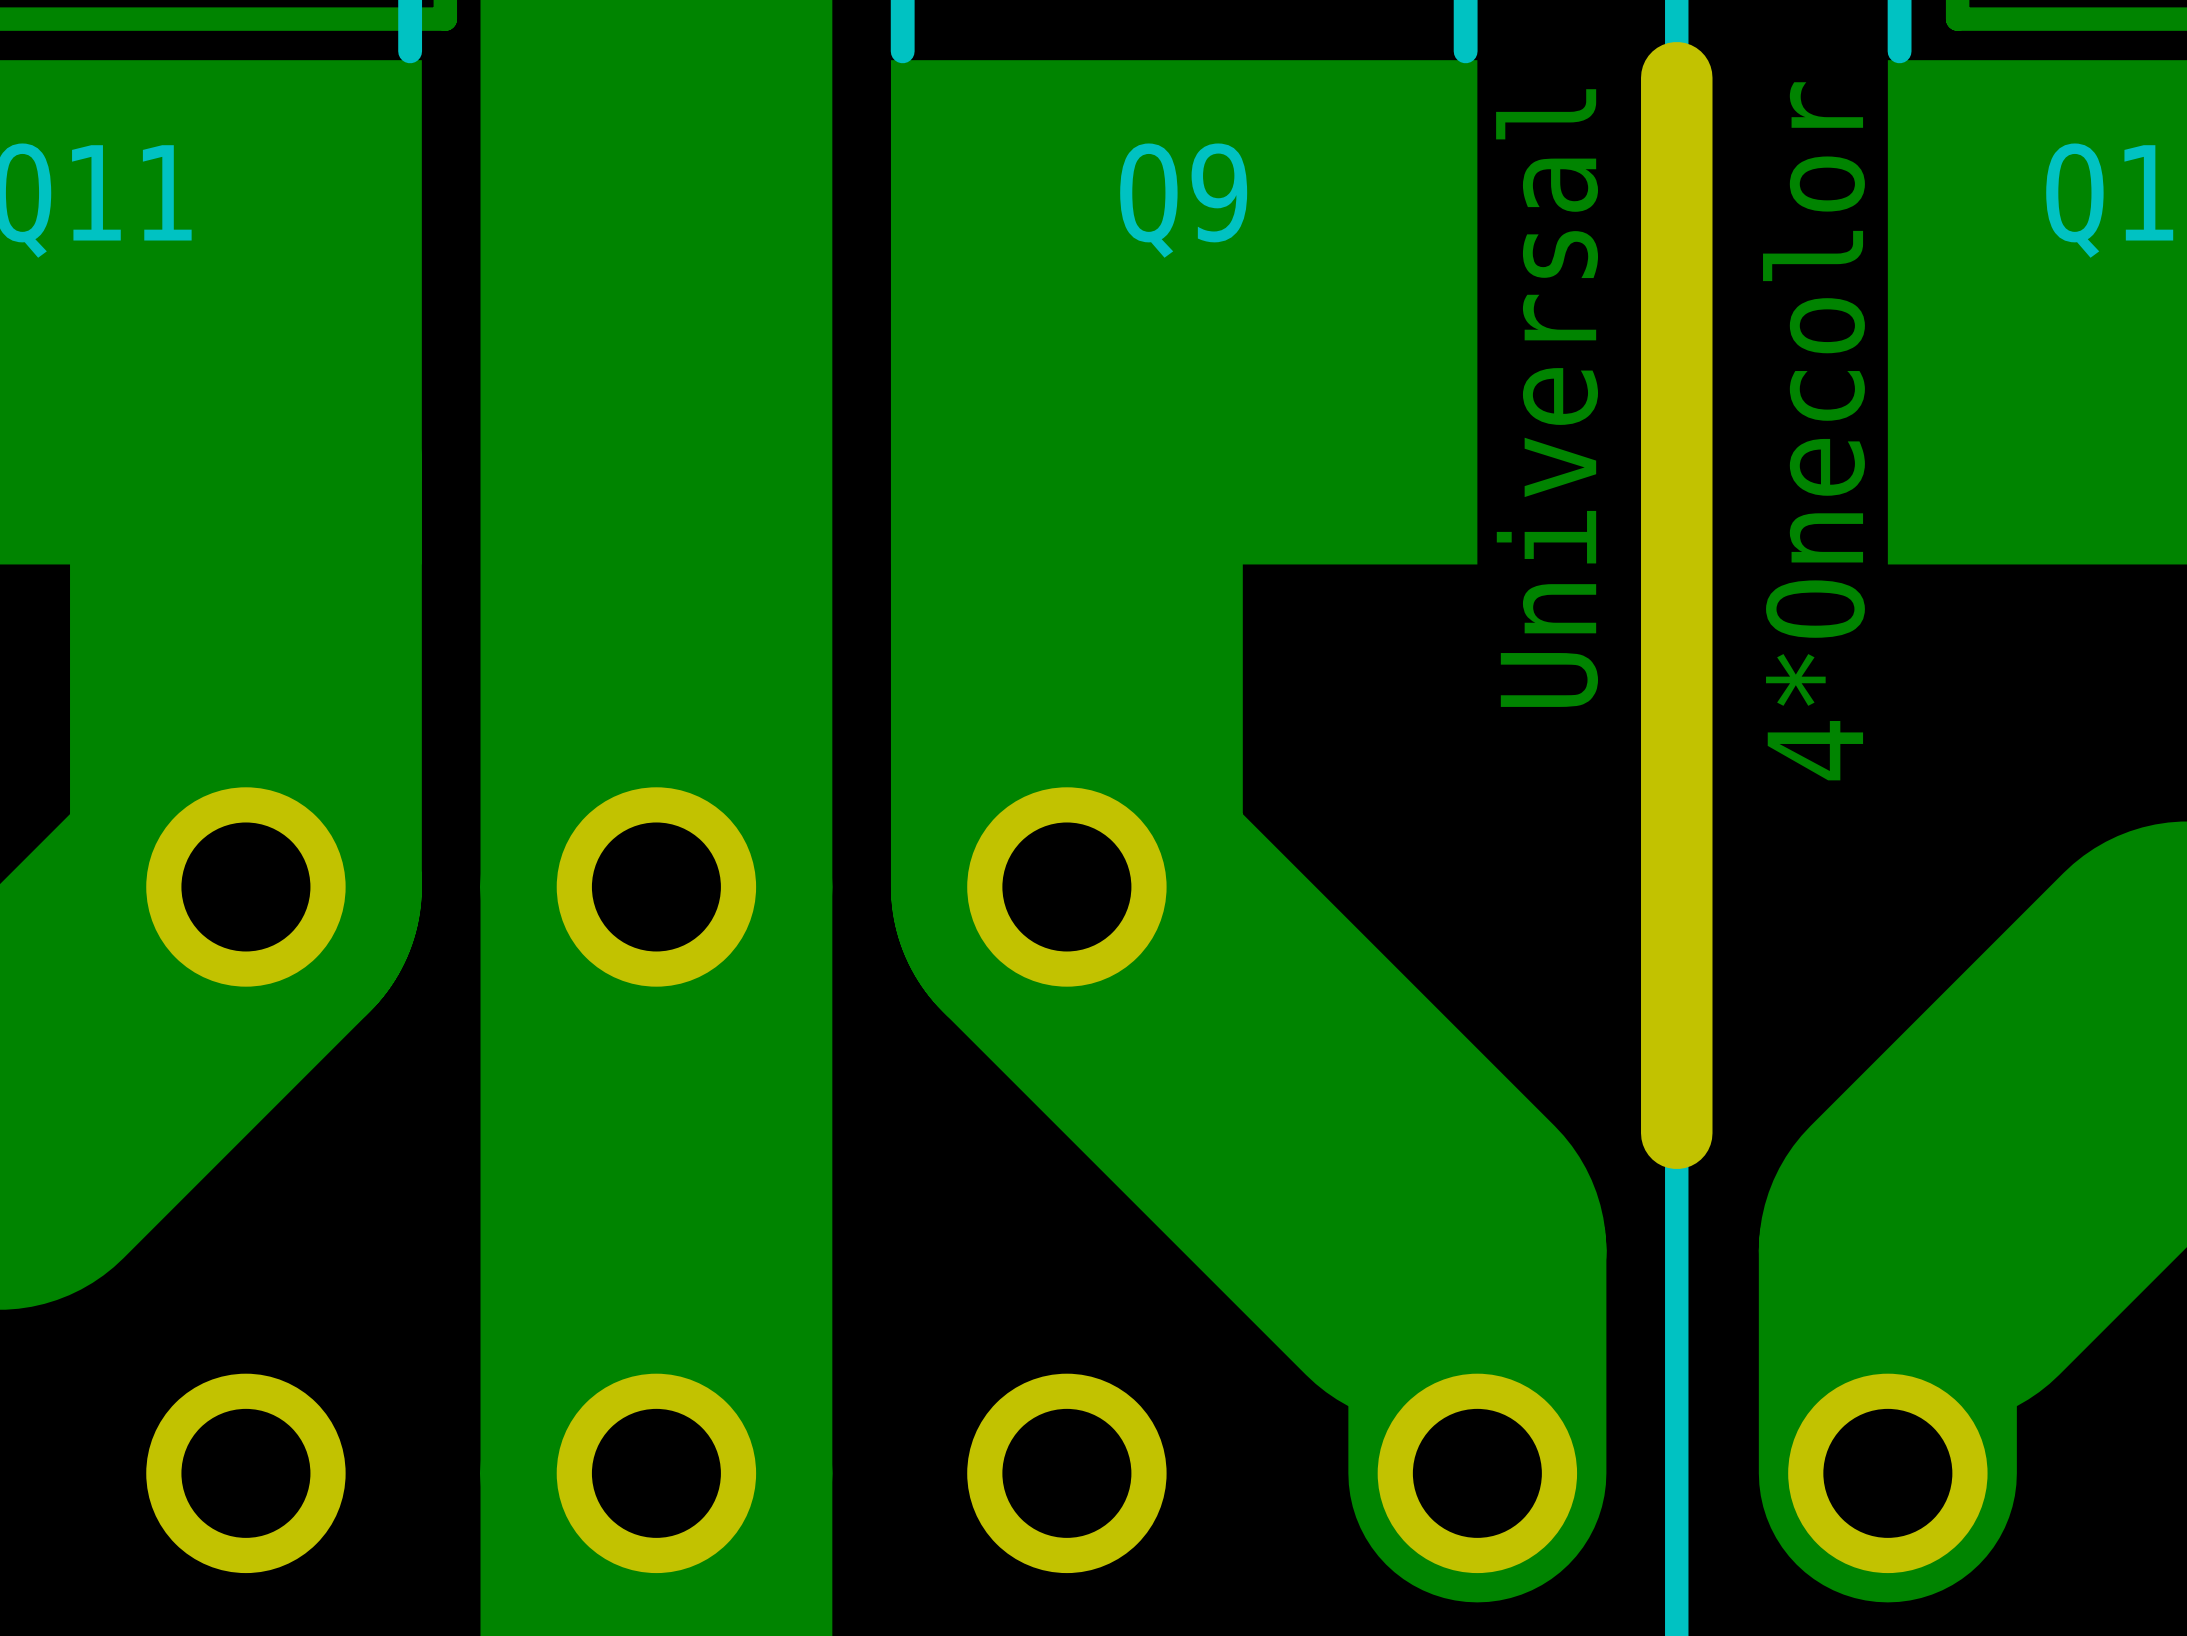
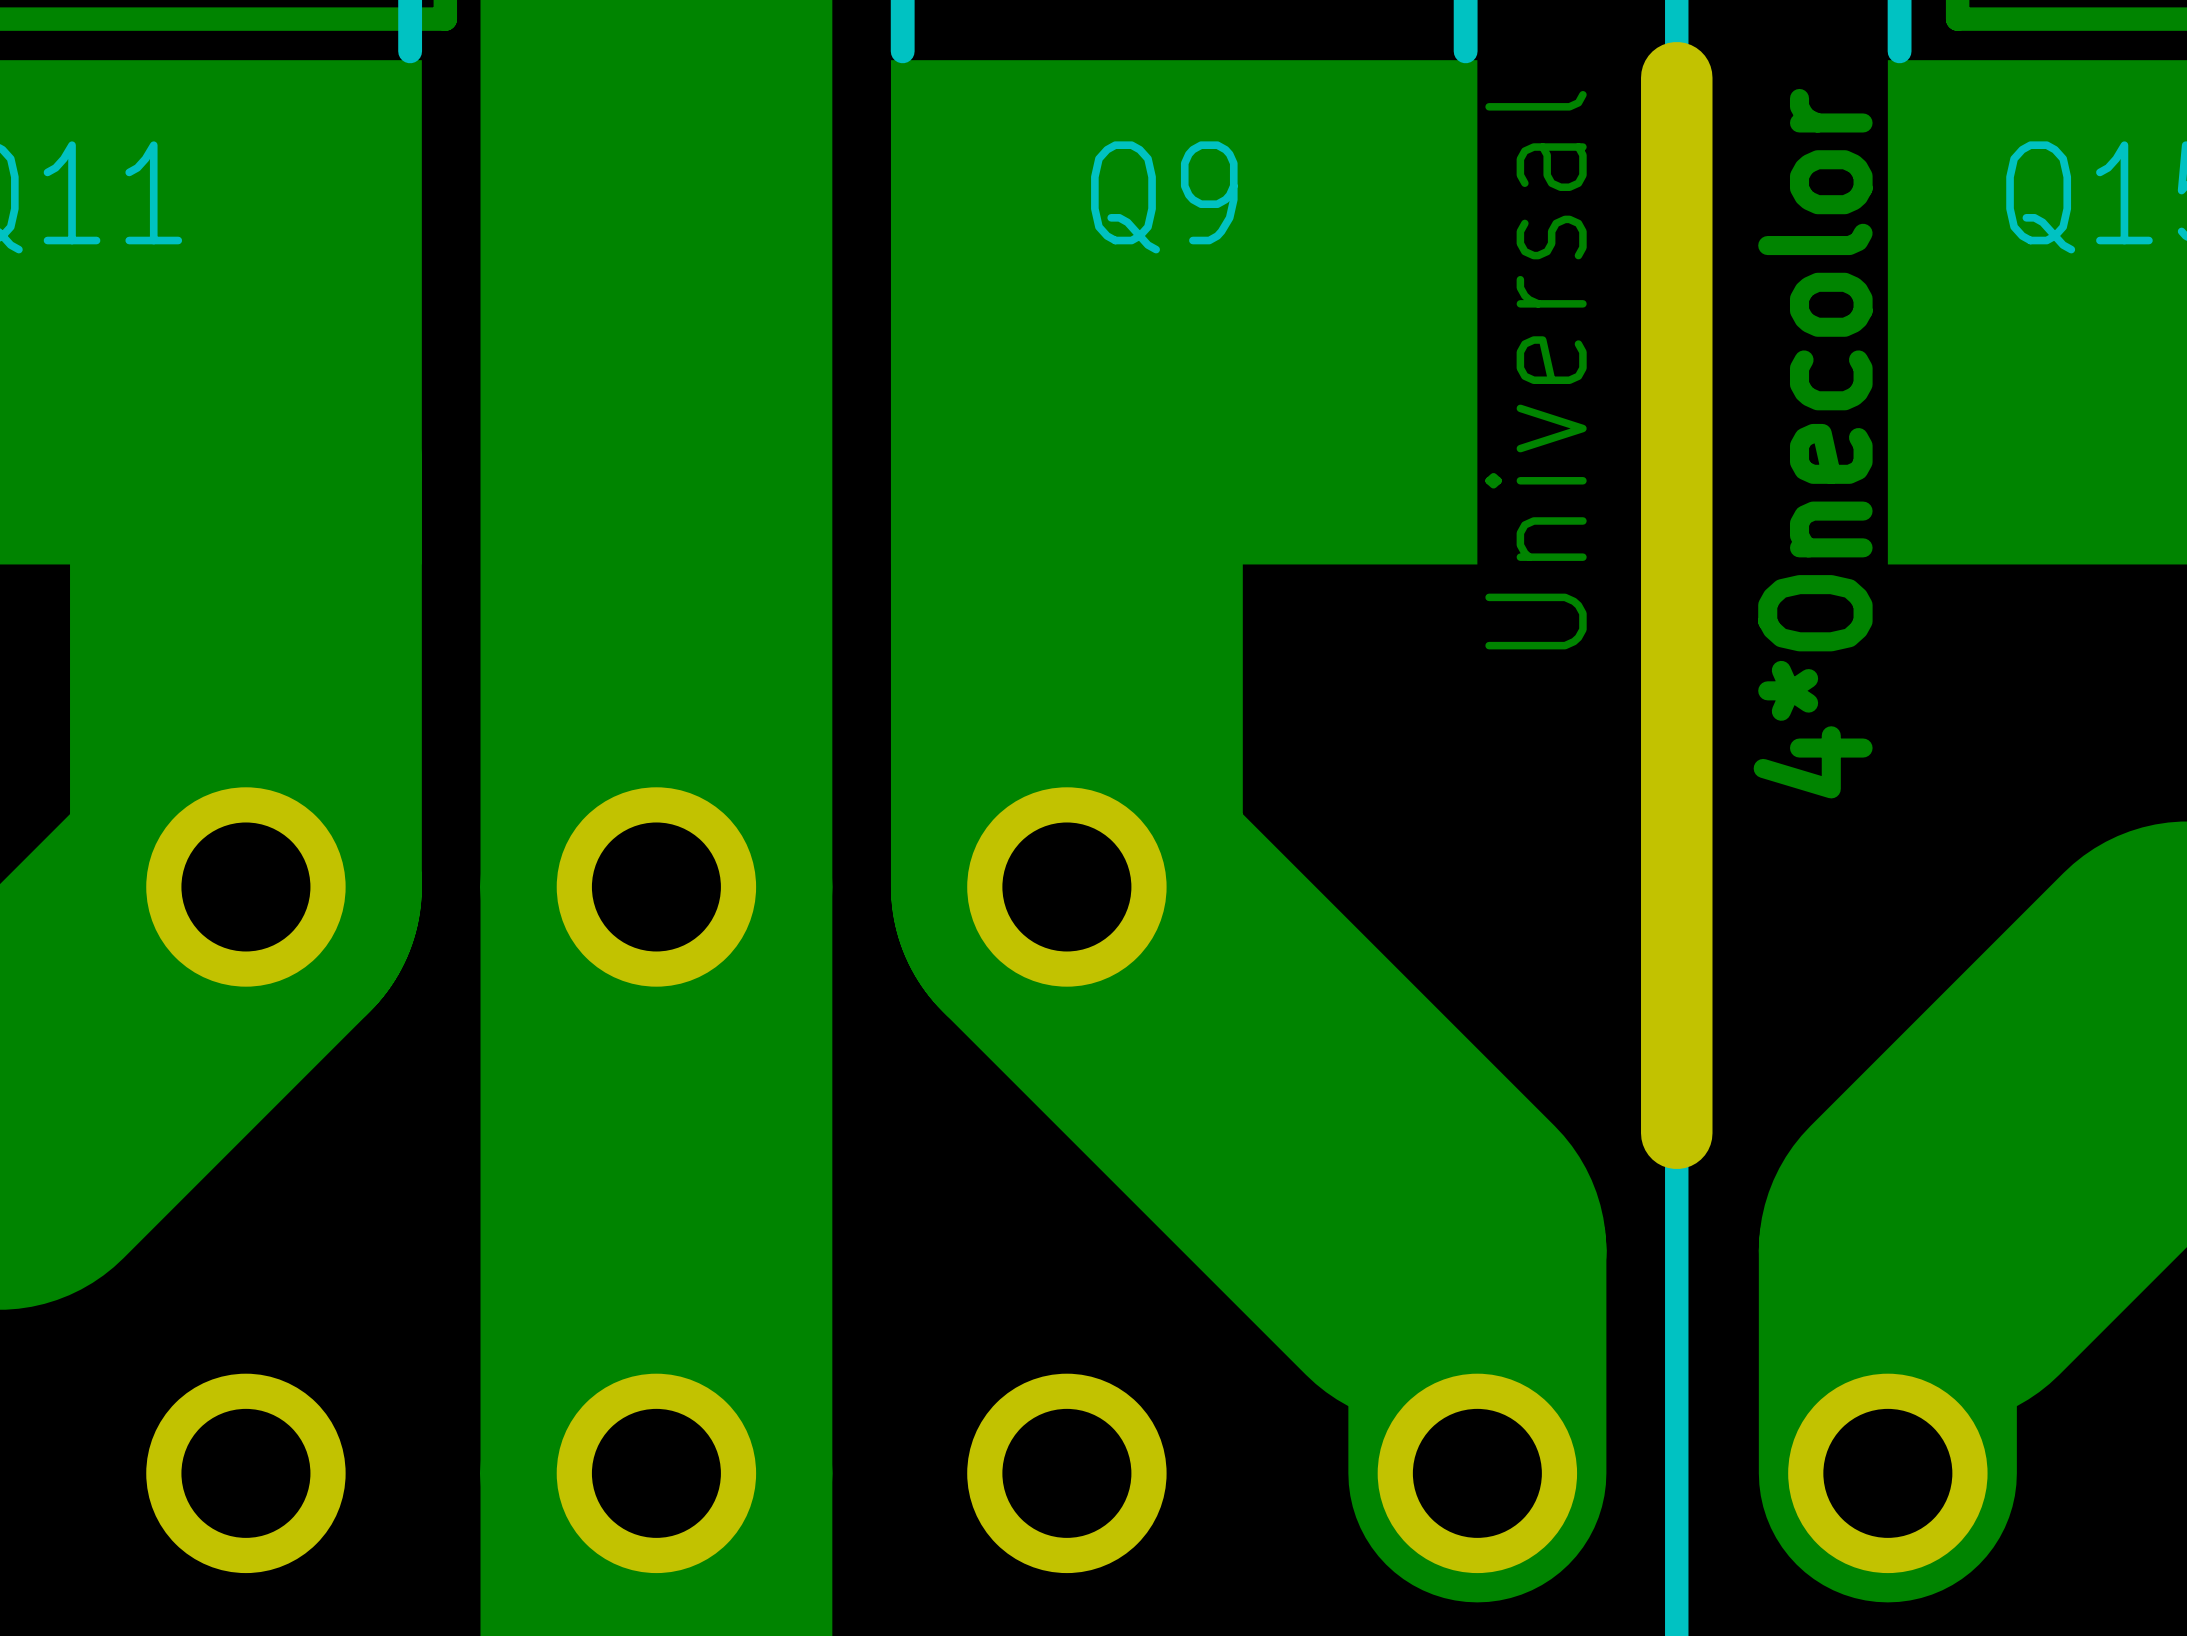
text position: Universal (1547, 398) -> Universal (1536, 370)

